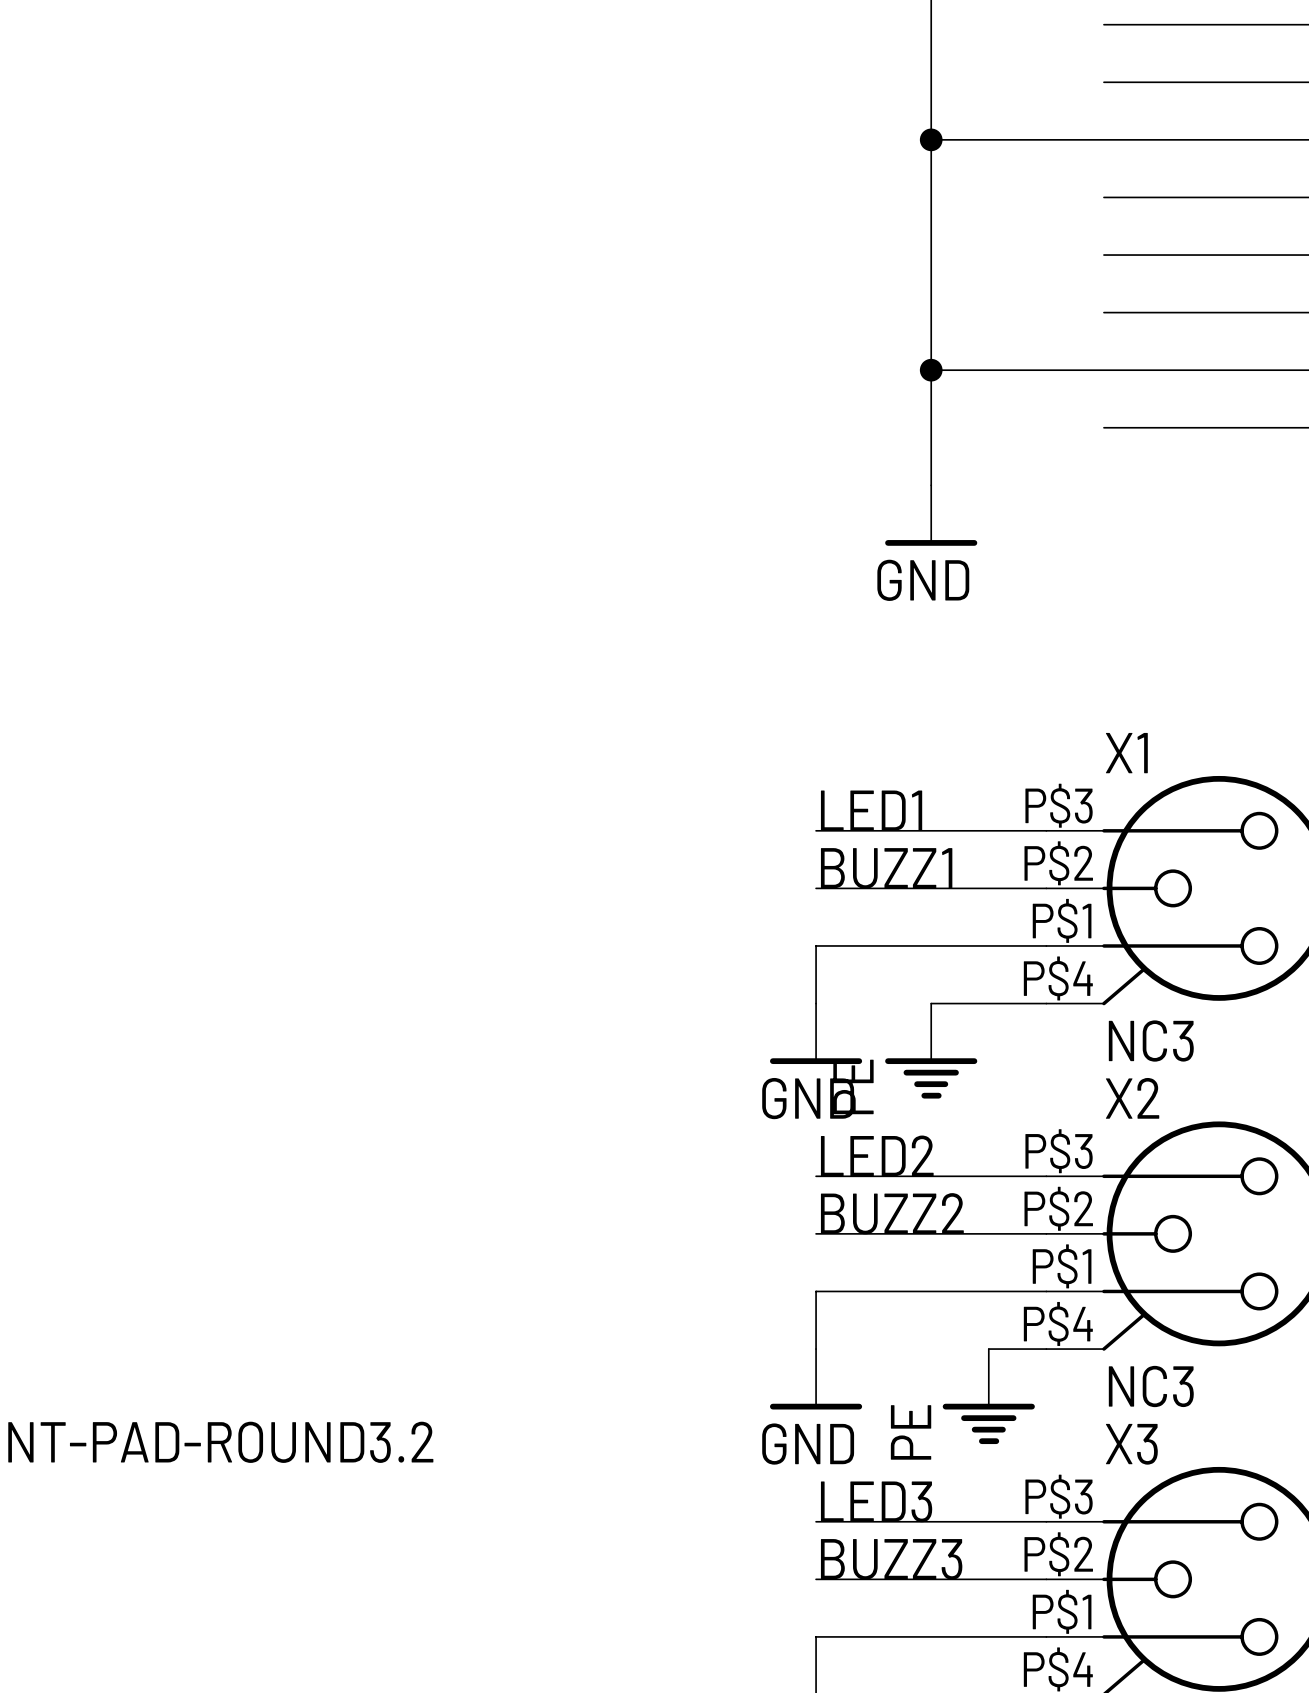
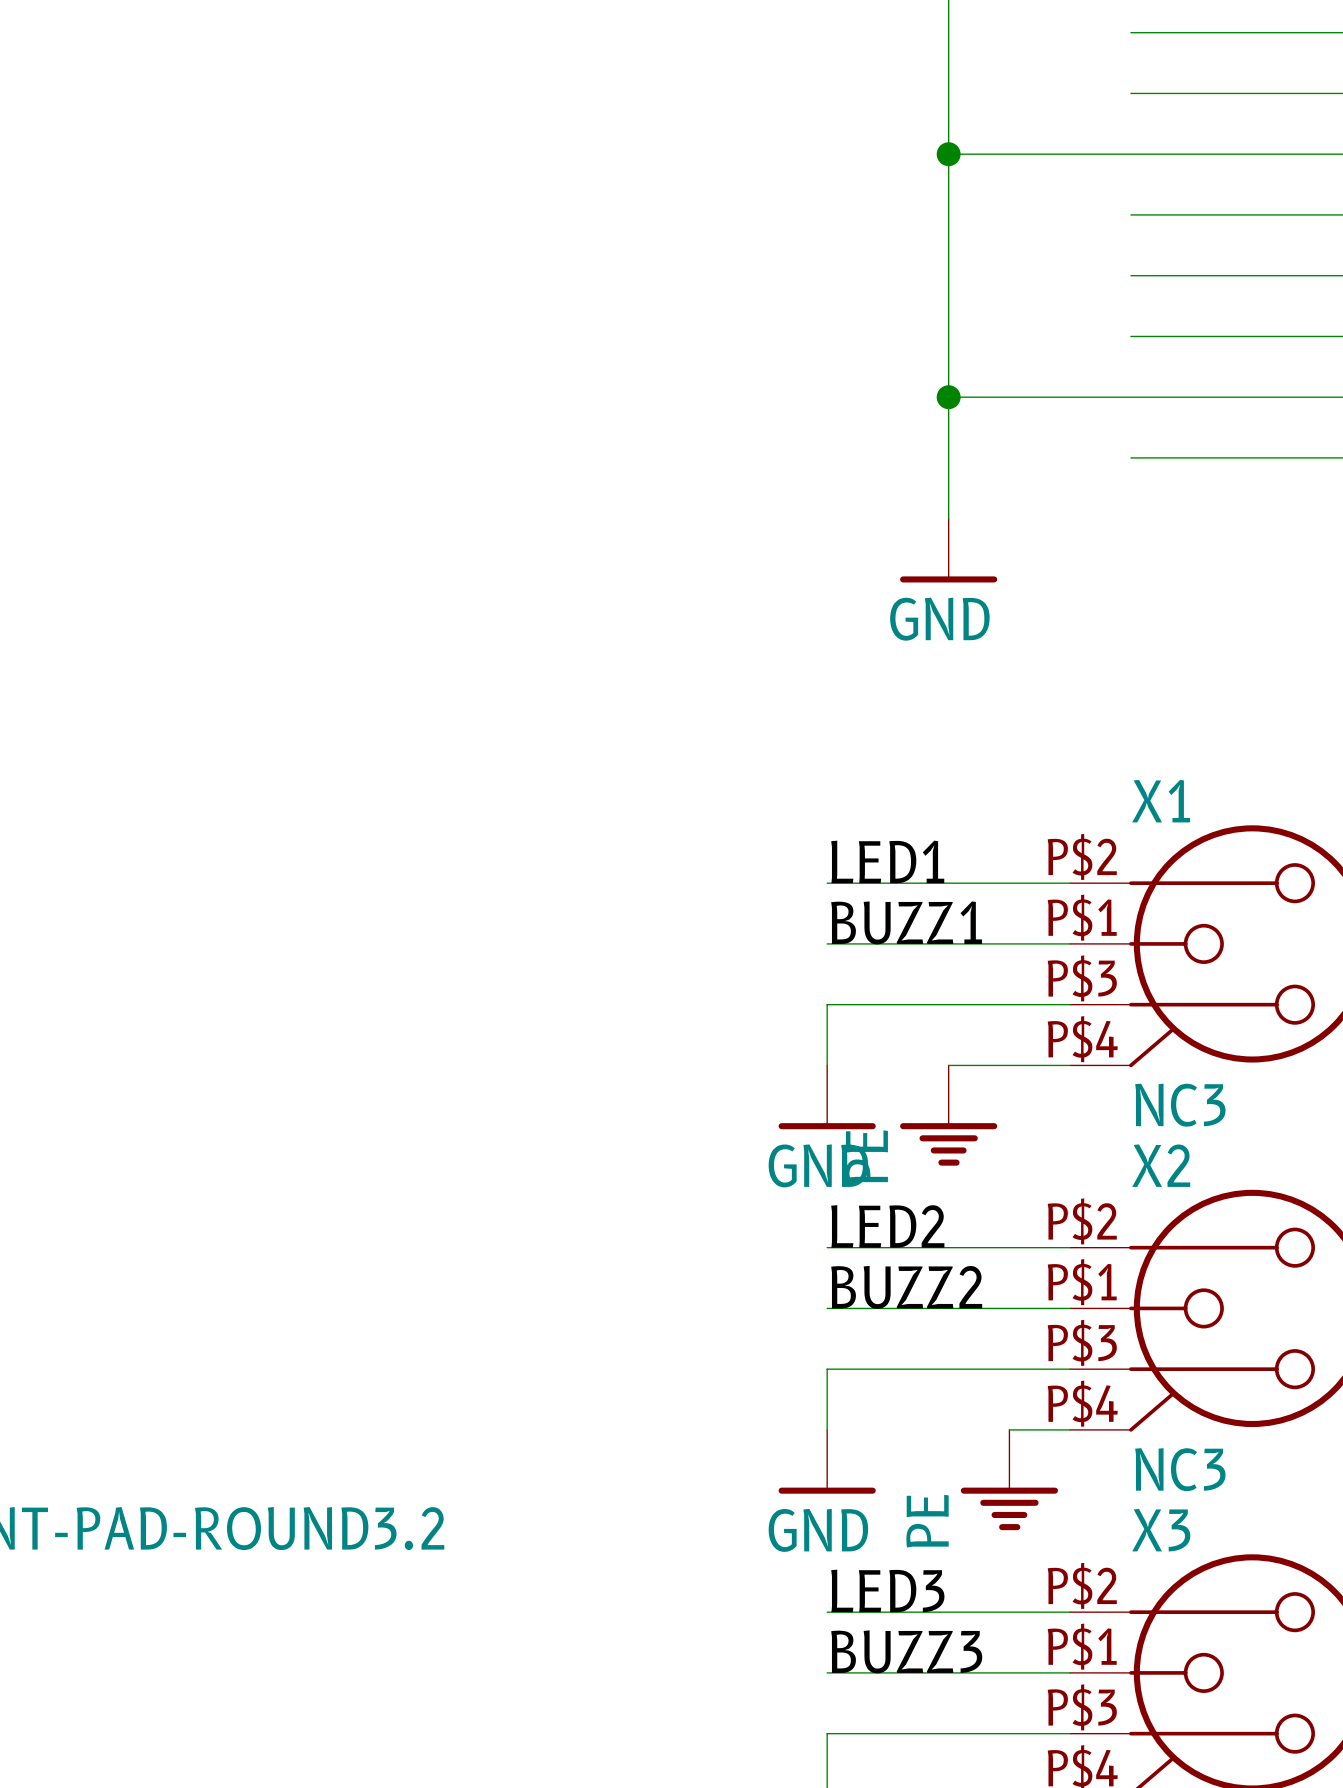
X1 pin number: P$3 (1059, 805) -> P$2 (1082, 856)
X1 pin number: P$2 (1058, 863) -> P$1 (1082, 917)
X1 pin number: P$1 (1062, 920) -> P$3 (1082, 978)
X2 pin number: P$3 (1059, 1151) -> P$2 (1082, 1221)
X2 pin number: P$2 (1058, 1208) -> P$1 (1082, 1282)
X2 pin number: P$1 (1062, 1266) -> P$3 (1082, 1342)
X3 pin number: P$3 (1059, 1496) -> P$2 (1082, 1585)
X3 pin number: P$2 (1058, 1554) -> P$1 (1082, 1646)
X3 pin number: P$1 (1062, 1611) -> P$3 (1082, 1707)

